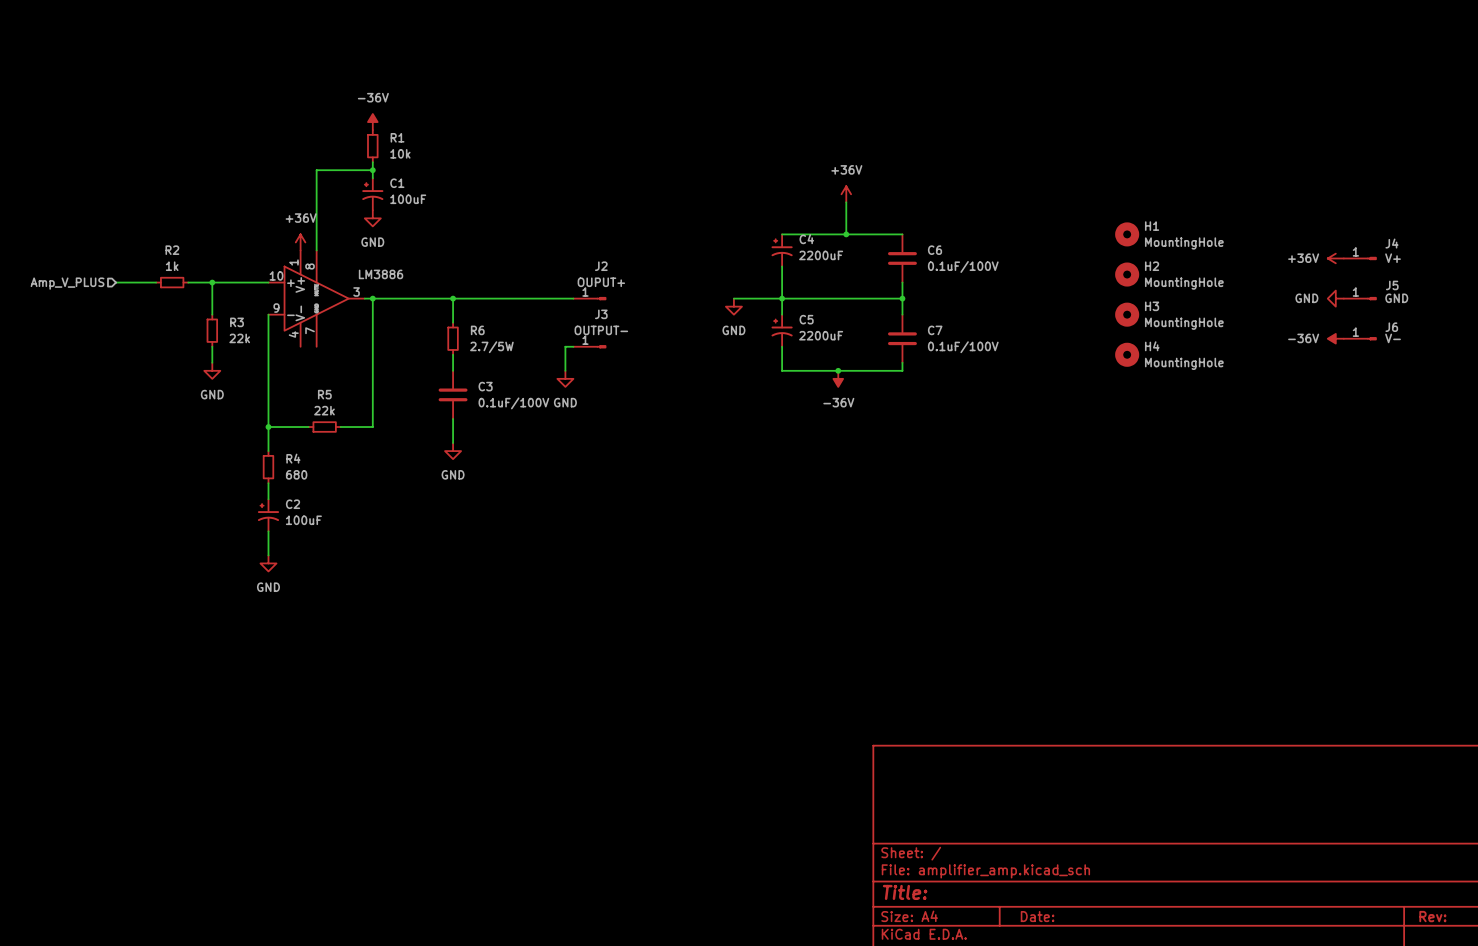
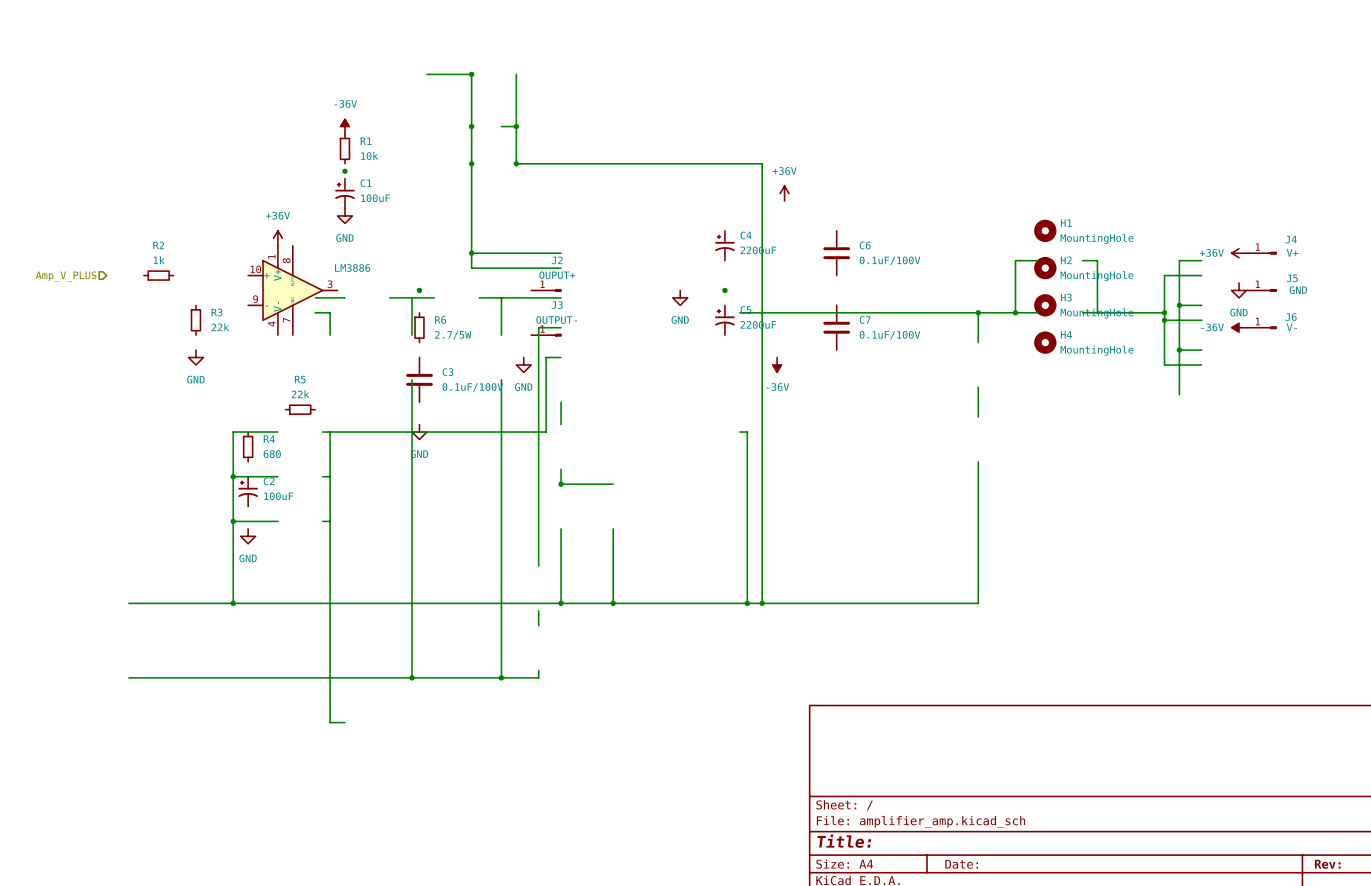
wire: none -> (426, 74) (471, 74) (471, 268) (561, 268)
junction: none -> (471, 74)
wire: none -> (516, 74) (516, 163) (762, 163) (762, 603)
junction: none -> (471, 126)
wire: none -> (501, 126) (516, 126)
junction: none -> (516, 126)
wire: (372, 162) (372, 178) -> none
junction: none -> (471, 163)
junction: none -> (516, 163)
wire: (372, 170) (316, 170) (316, 250) -> none
wire: (846, 202) (846, 234) -> none
wire: (782, 234) (902, 234) -> none
junction: (846, 234) -> none
wire: none -> (471, 253) (561, 253)
junction: none -> (471, 253)
wire: (782, 266) (782, 314) -> none
wire: none -> (1037, 260) (1015, 260) (1015, 312)
wire: none -> (1082, 260) (1097, 260) (1097, 312)
wire: none -> (1201, 260) (1179, 260) (1179, 394)
wire: (116, 282) (156, 282) -> none
wire: (188, 282) (268, 282) -> none
wire: (212, 282) (212, 314) -> none
junction: (212, 282) -> none
wire: (902, 282) (902, 314) -> (978, 312) (978, 342)
wire: none -> (1201, 275) (1164, 275) (1164, 364) (1201, 364)
wire: (364, 298) (573, 298) -> none
wire: (372, 298) (372, 427) (340, 427) -> none
junction: (372, 298) -> none
wire: (453, 298) (453, 322) -> none
wire: (733, 298) (902, 298) -> none
junction: (902, 298) -> none
power symbol rotation: 0° (1335, 298) -> 90° counterclockwise (1239, 290)
wire: none -> (315, 297) (344, 297)
wire: none -> (389, 297) (434, 297)
wire: none -> (412, 297) (412, 335)
wire: none -> (479, 297) (561, 297)
wire: none -> (501, 297) (501, 335)
wire: (268, 314) (268, 451) -> none
wire: none -> (1179, 305) (1201, 305)
junction: none -> (1179, 305)
wire: none -> (315, 312) (330, 312) (330, 335)
wire: none -> (739, 312) (1037, 312)
junction: none -> (978, 312)
junction: none -> (1015, 312)
wire: none -> (1082, 312) (1164, 312)
junction: none -> (1164, 312)
wire: none -> (1164, 320) (1201, 320)
junction: none -> (1164, 320)
wire: none -> (561, 327) (538, 327) (538, 566)
wire: (212, 346) (212, 362) -> none
wire: (573, 346) (565, 346) (565, 370) -> none
wire: (782, 346) (782, 370) (902, 370) (902, 362) -> none
wire: (453, 354) (453, 370) -> none
wire: none -> (1179, 350) (1201, 350)
junction: none -> (1179, 350)
wire: none -> (561, 357) (546, 357) (546, 432) (322, 432)
junction: (838, 370) -> none
wire: none -> (412, 379) (412, 677)
wire: none -> (501, 379) (501, 677)
wire: none -> (978, 387) (978, 417)
wire: (453, 418) (453, 443) -> (561, 402) (561, 424)
wire: (268, 427) (308, 427) -> none
junction: (268, 427) -> none
wire: none -> (277, 432) (233, 432) (233, 603)
wire: none -> (330, 432) (330, 722) (344, 722)
wire: none -> (739, 432) (747, 432) (747, 603)
wire: (268, 483) (268, 499) -> none
wire: none -> (978, 461) (978, 603) (128, 603)
wire: none -> (561, 469) (561, 484) (613, 484)
wire: none -> (233, 476) (277, 476)
junction: none -> (233, 476)
wire: none -> (322, 476) (330, 476)
junction: none -> (561, 484)
wire: (268, 531) (268, 555) -> none
wire: none -> (233, 521) (277, 521)
junction: none -> (233, 521)
wire: none -> (322, 521) (330, 521)
wire: none -> (561, 528) (561, 603)
wire: none -> (613, 528) (613, 603)
junction: none -> (233, 603)
junction: none -> (561, 603)
junction: none -> (613, 603)
junction: none -> (747, 603)
junction: none -> (762, 603)
wire: none -> (538, 610) (538, 625)
wire: none -> (538, 670) (538, 677) (128, 677)
junction: none -> (412, 677)
junction: none -> (501, 677)

